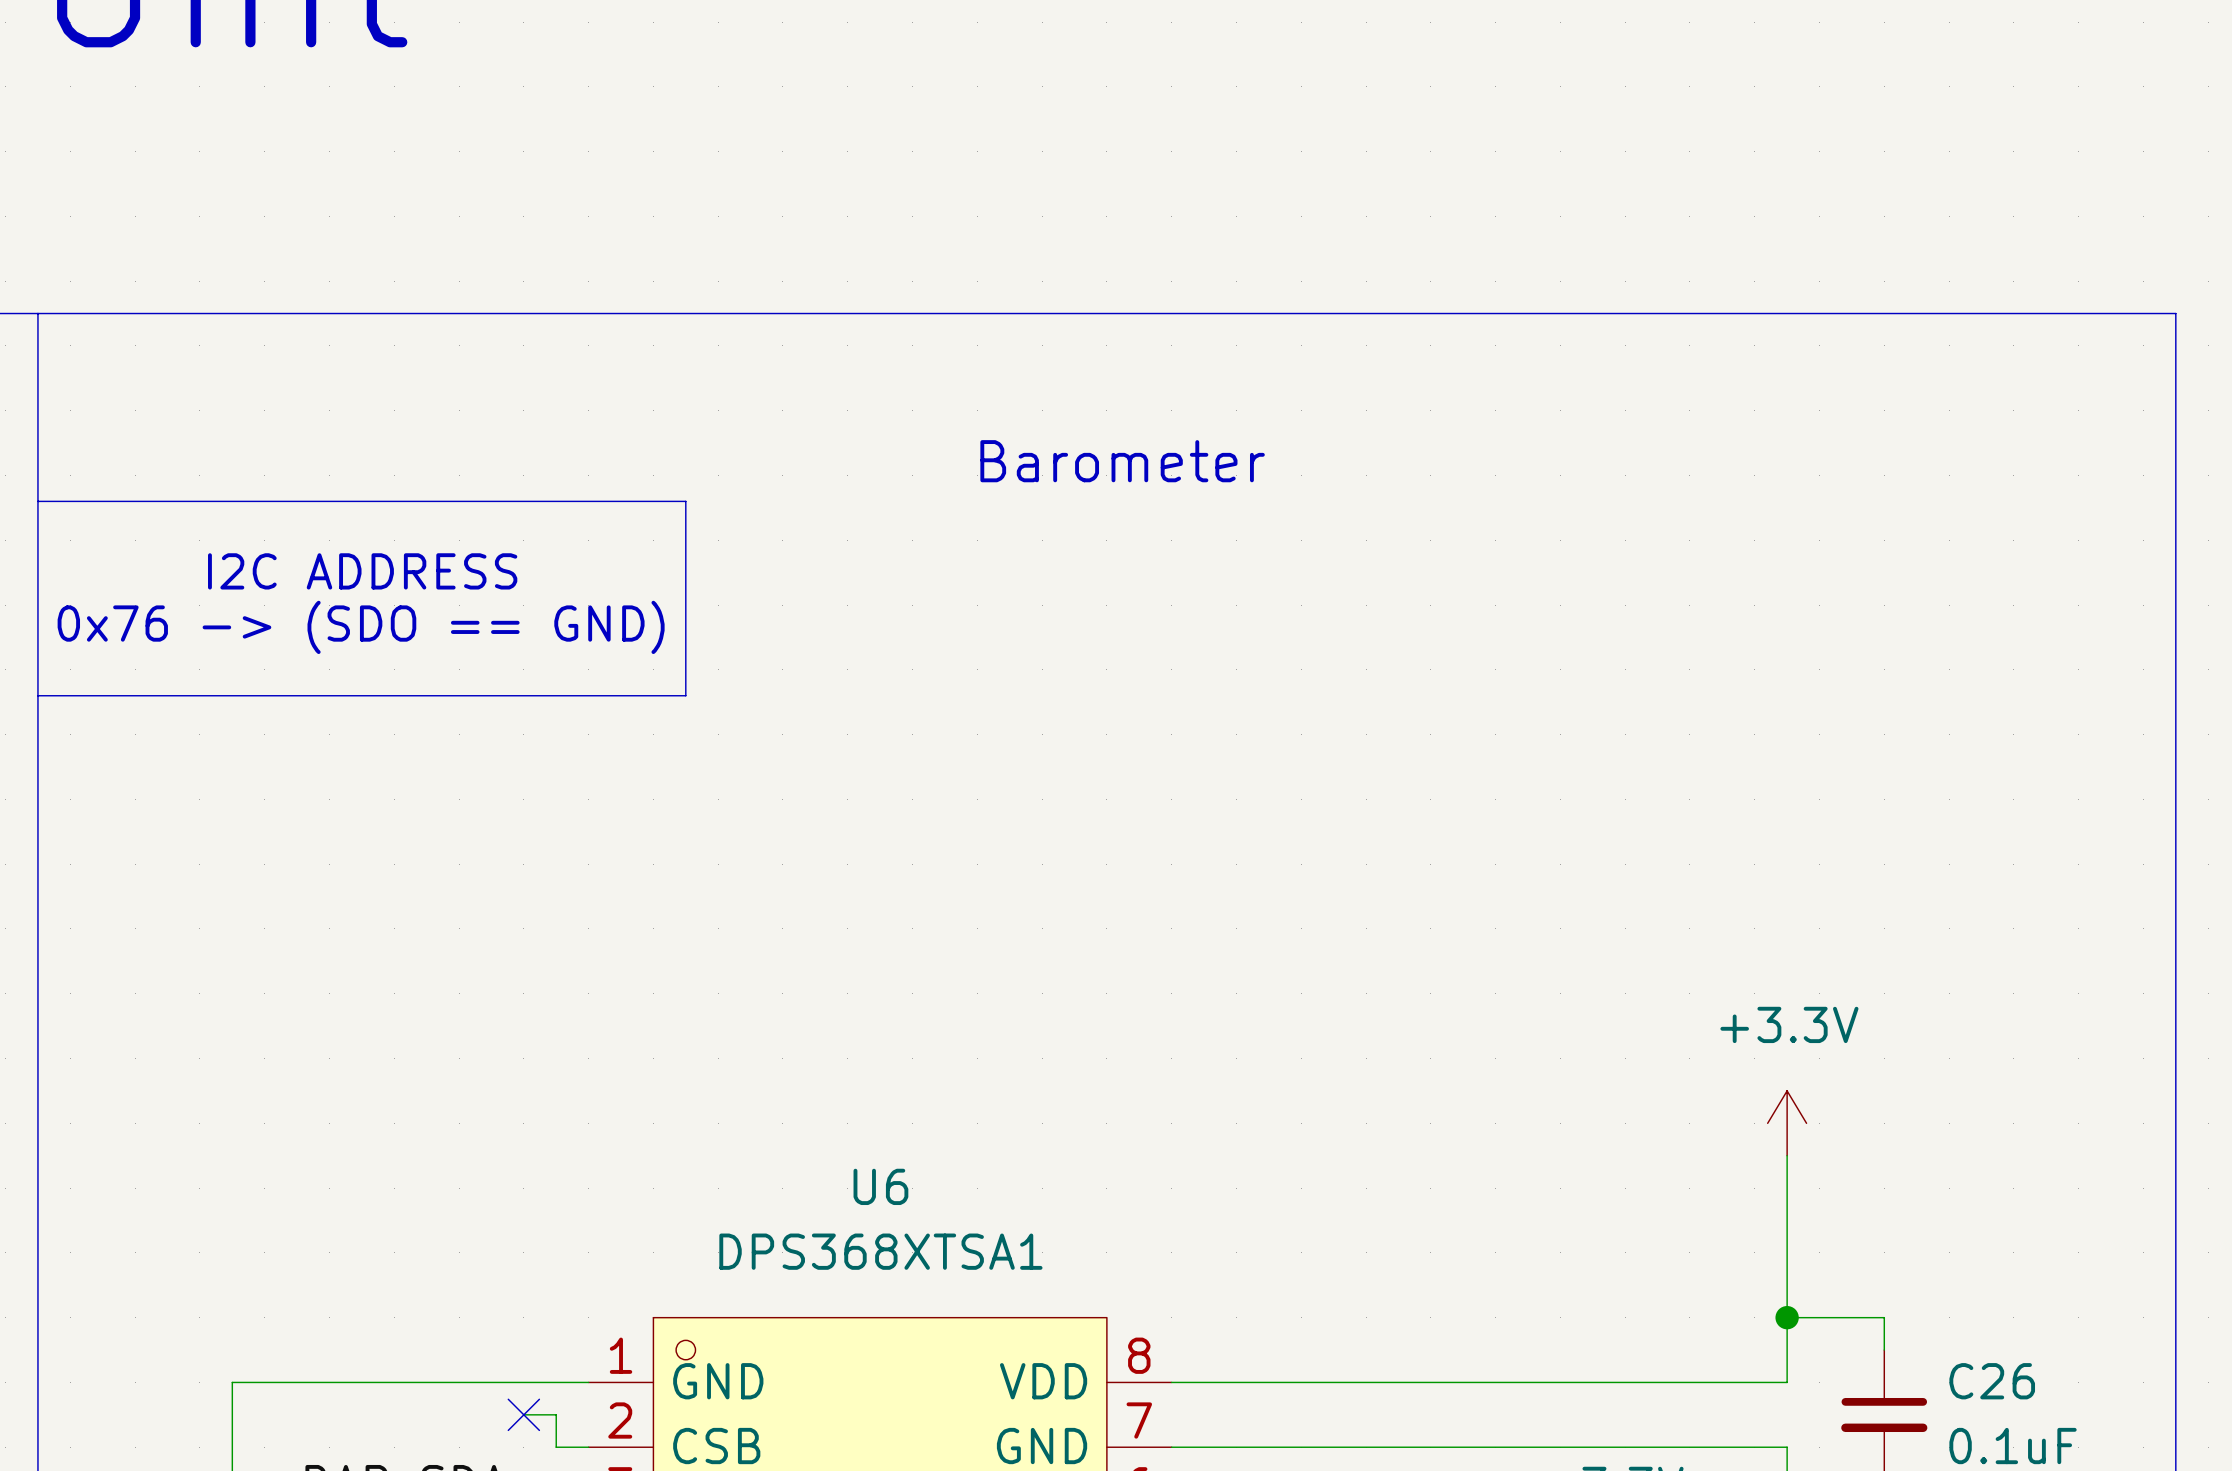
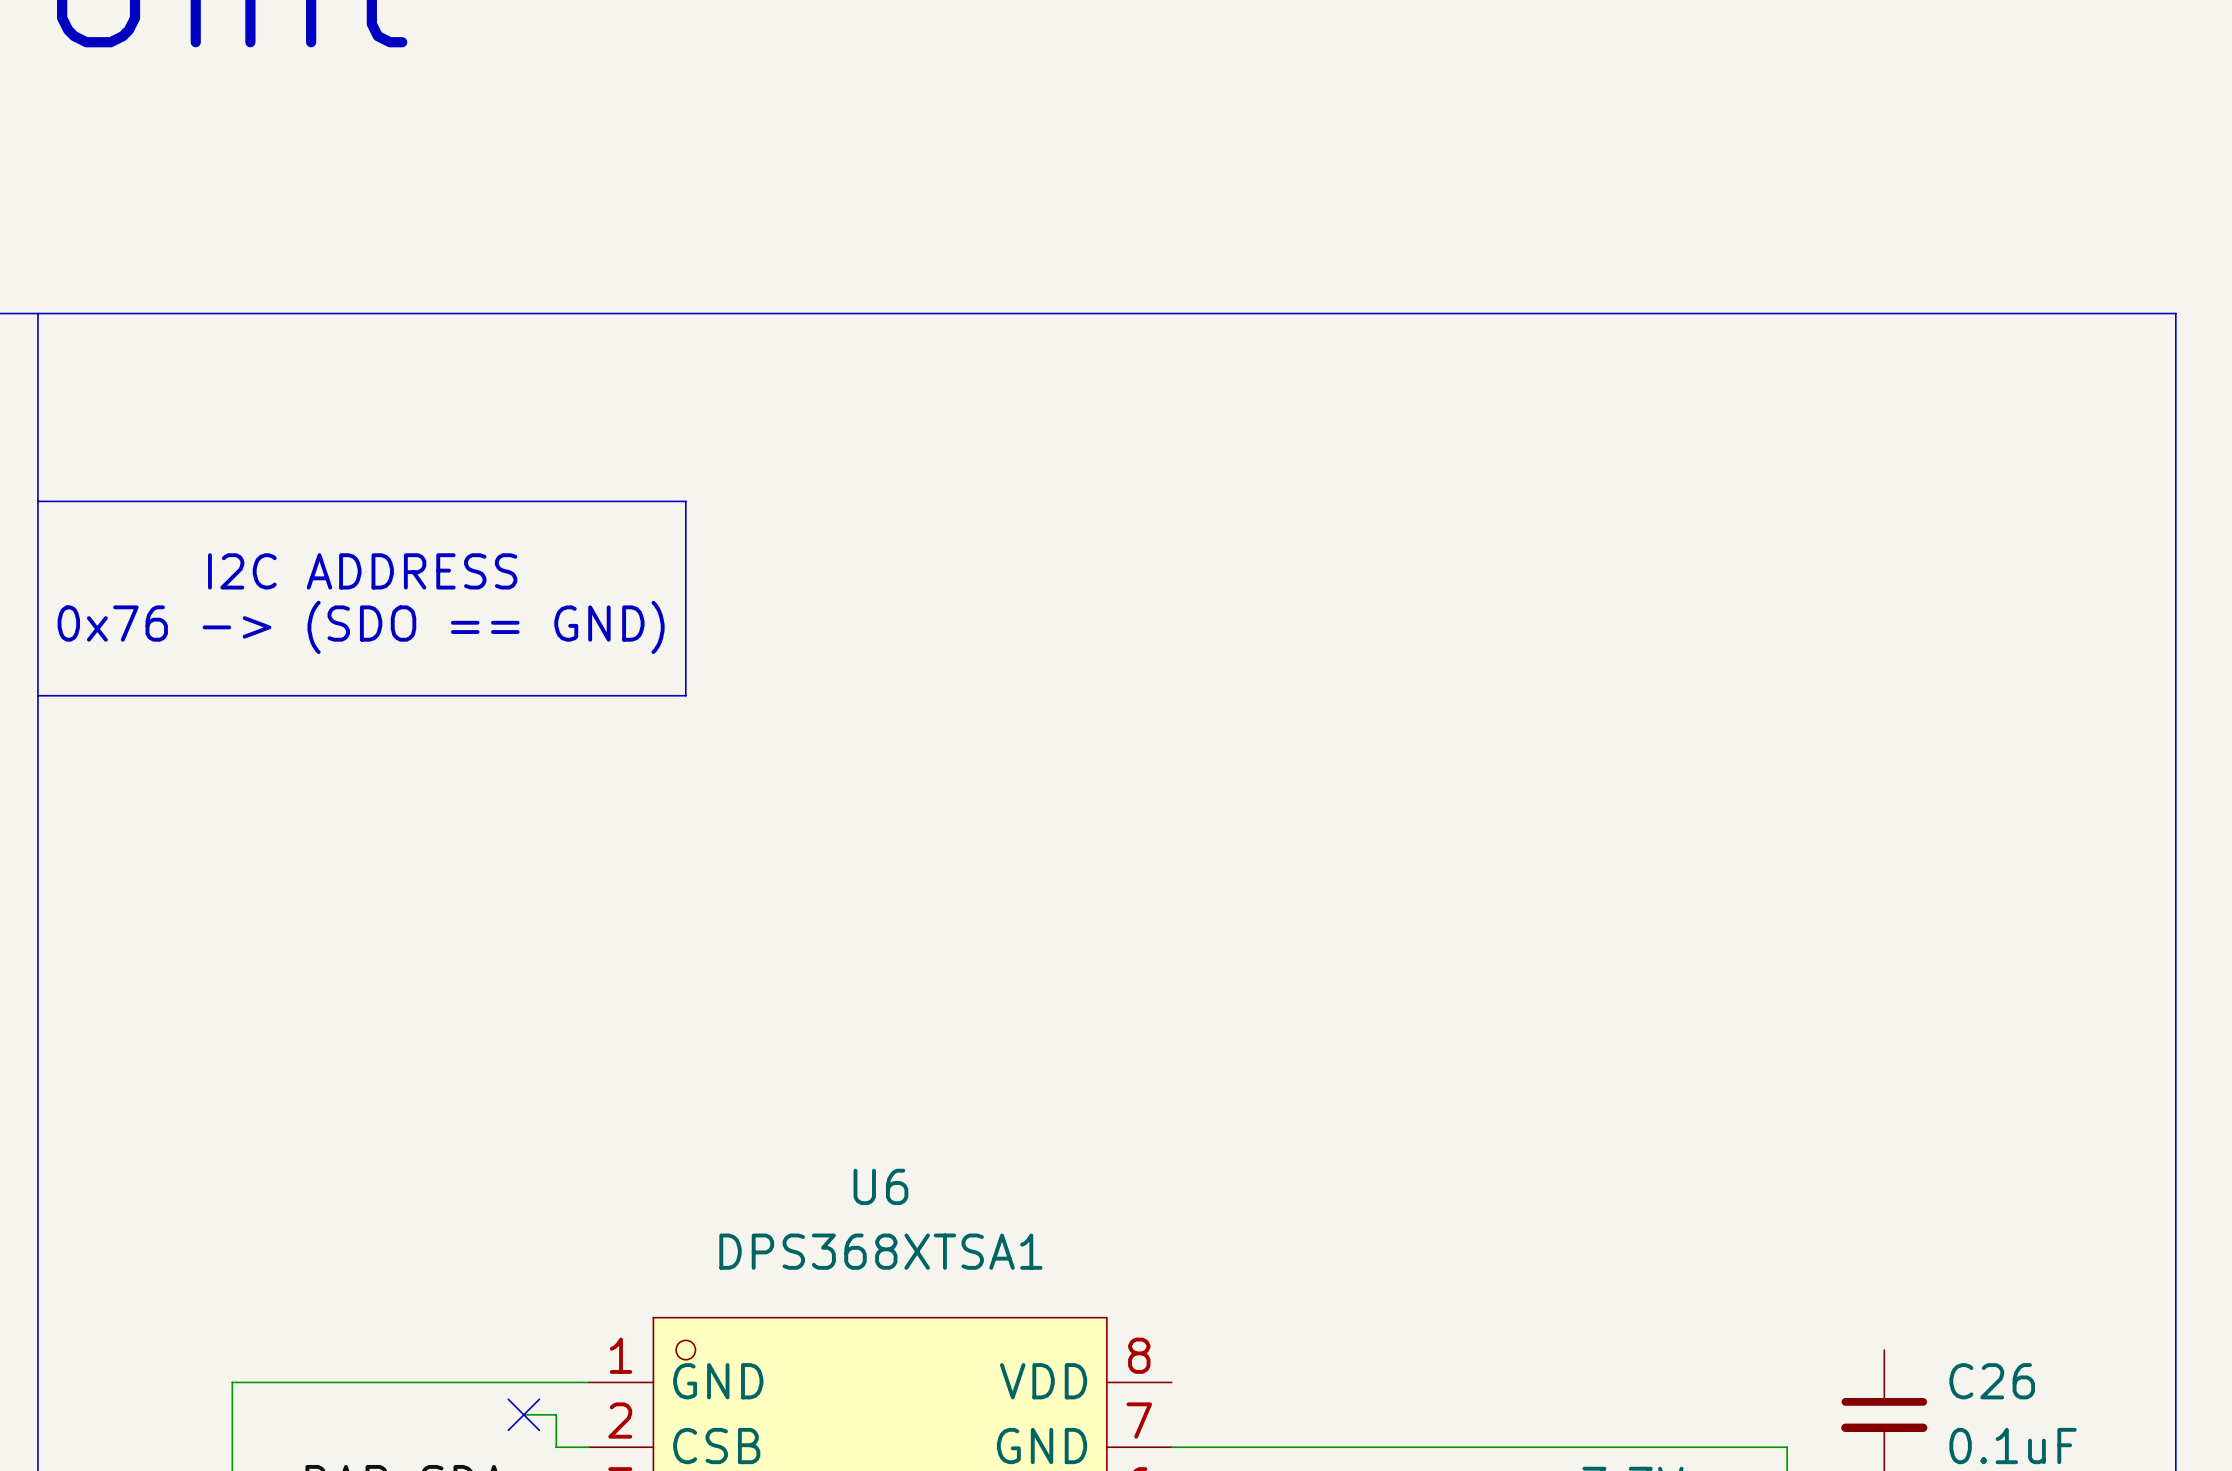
text: Barometer (1122, 461) -> none
power symbol: +3.3V (1787, 1123) -> none
wire: (1787, 1155) (1787, 1382) (1171, 1382) -> none
wire: (1787, 1317) (1884, 1317) (1884, 1350) -> none
junction: (1787, 1317) -> none

